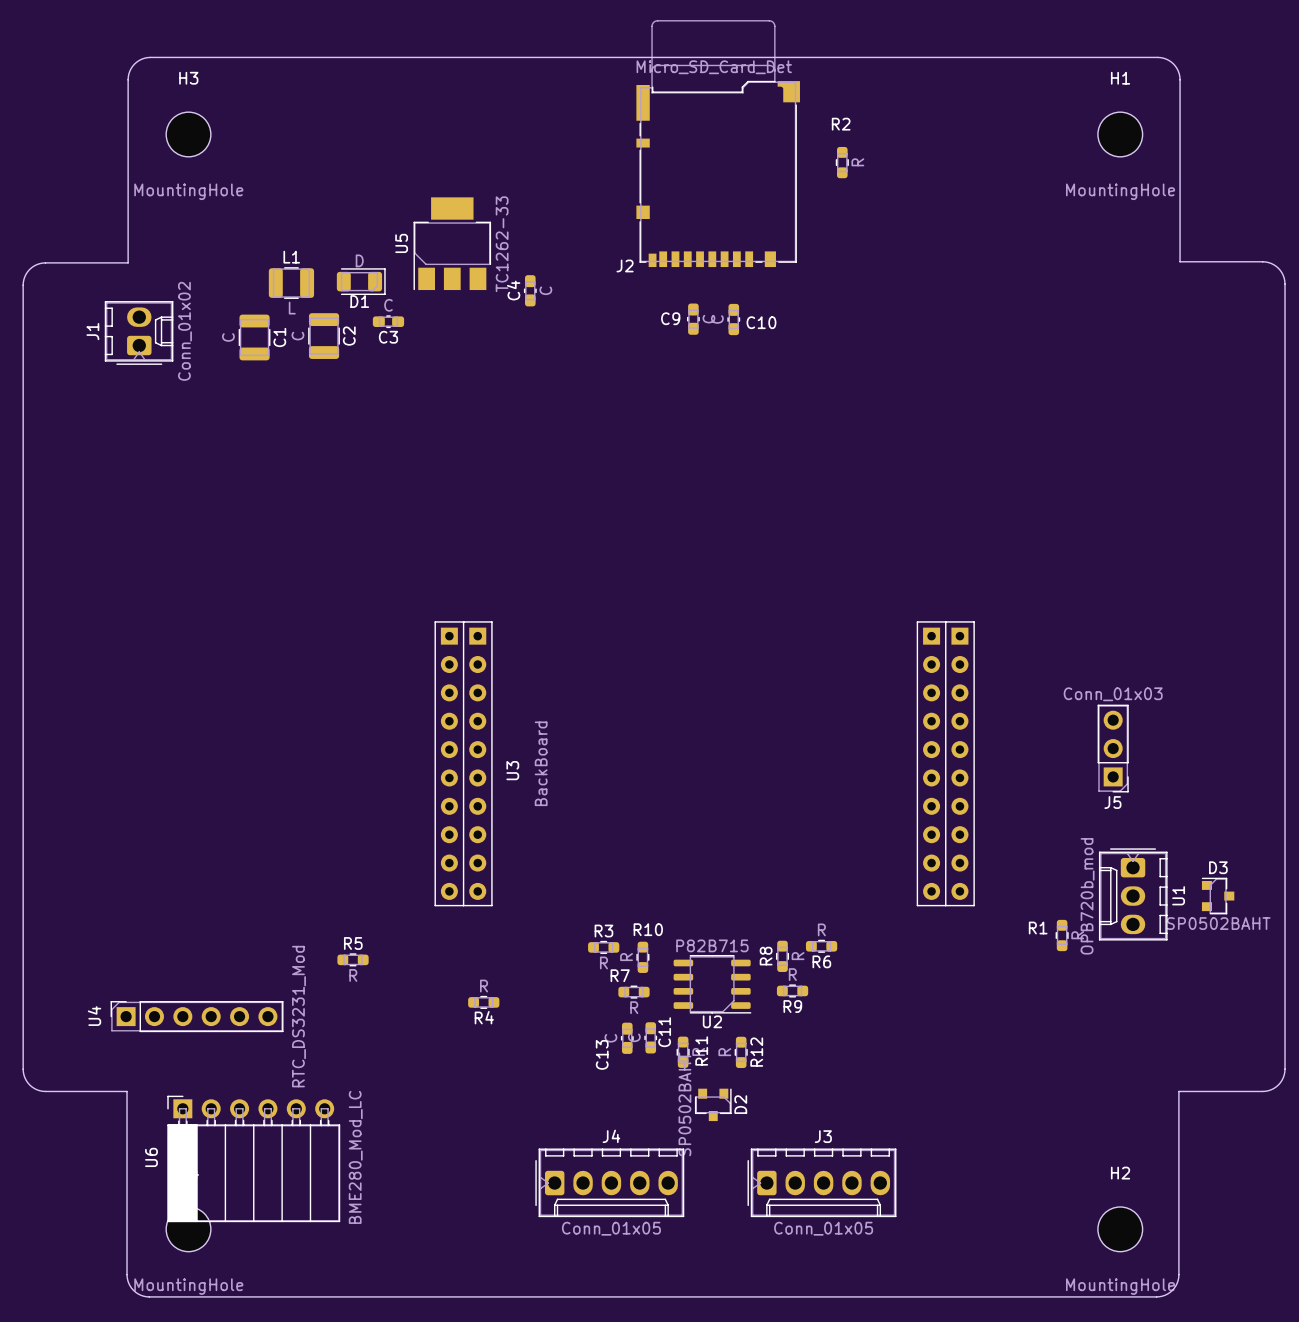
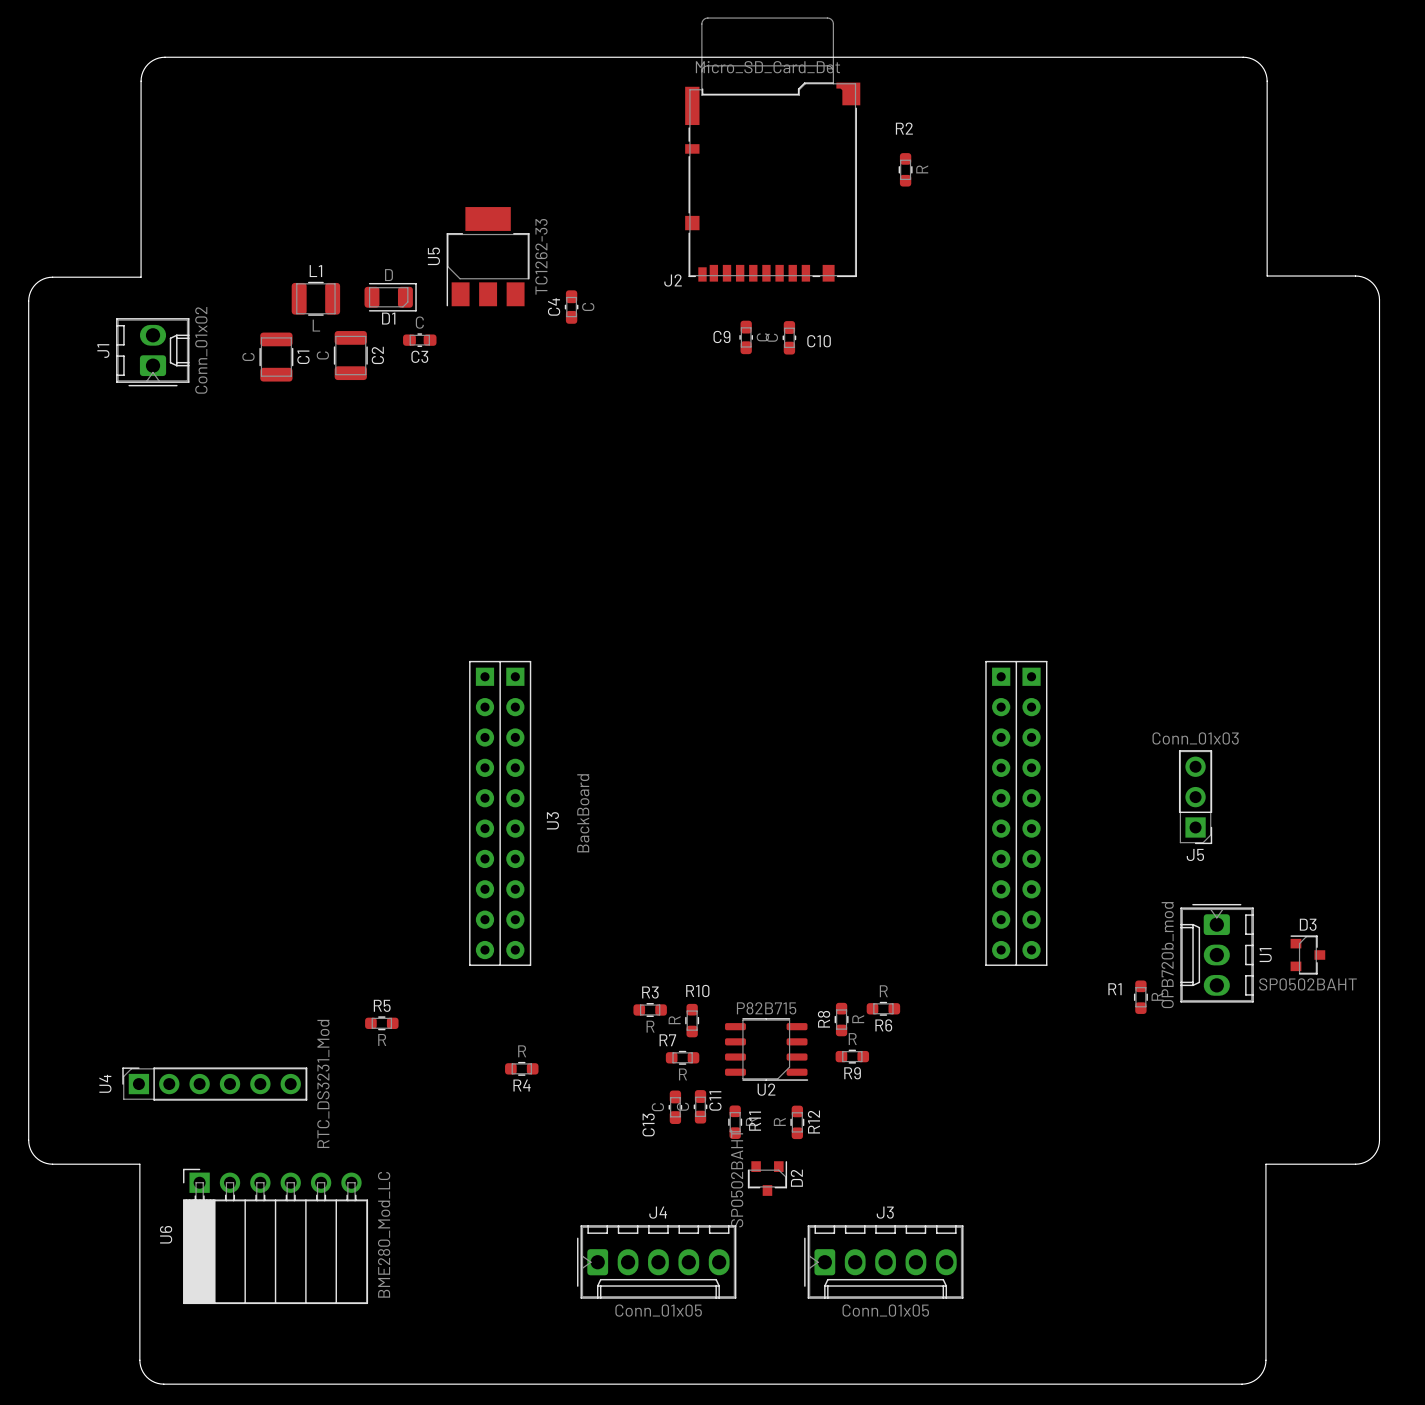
H3: MountingHole (188, 134) -> none
H1: MountingHole (1120, 134) -> none
part: MountingHole (188, 1229) -> none
H2: MountingHole (1120, 1229) -> none

